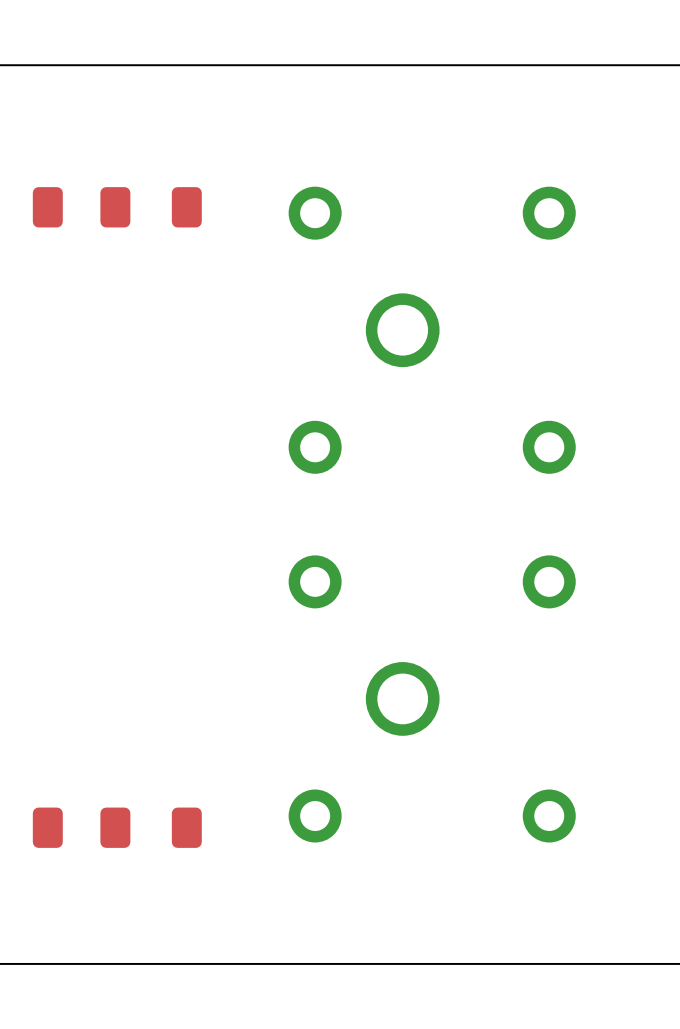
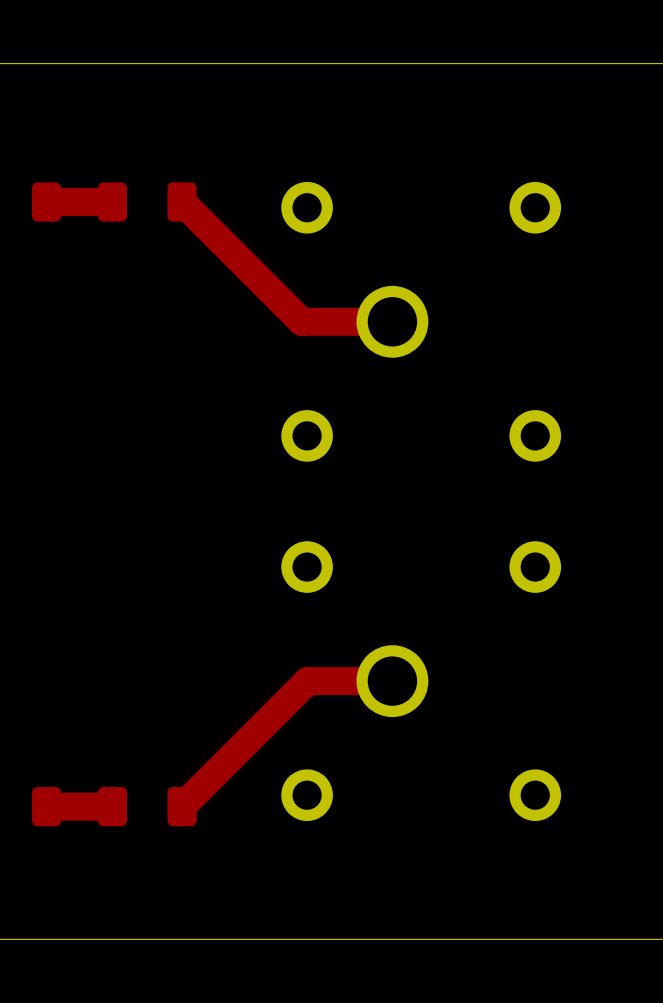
top track: none -> (112, 202) (46, 202)
top track: none -> (182, 202) (301, 321) (392, 321)
top track: none -> (392, 681) (307, 681) (182, 806)
top track: none -> (112, 806) (46, 806)

